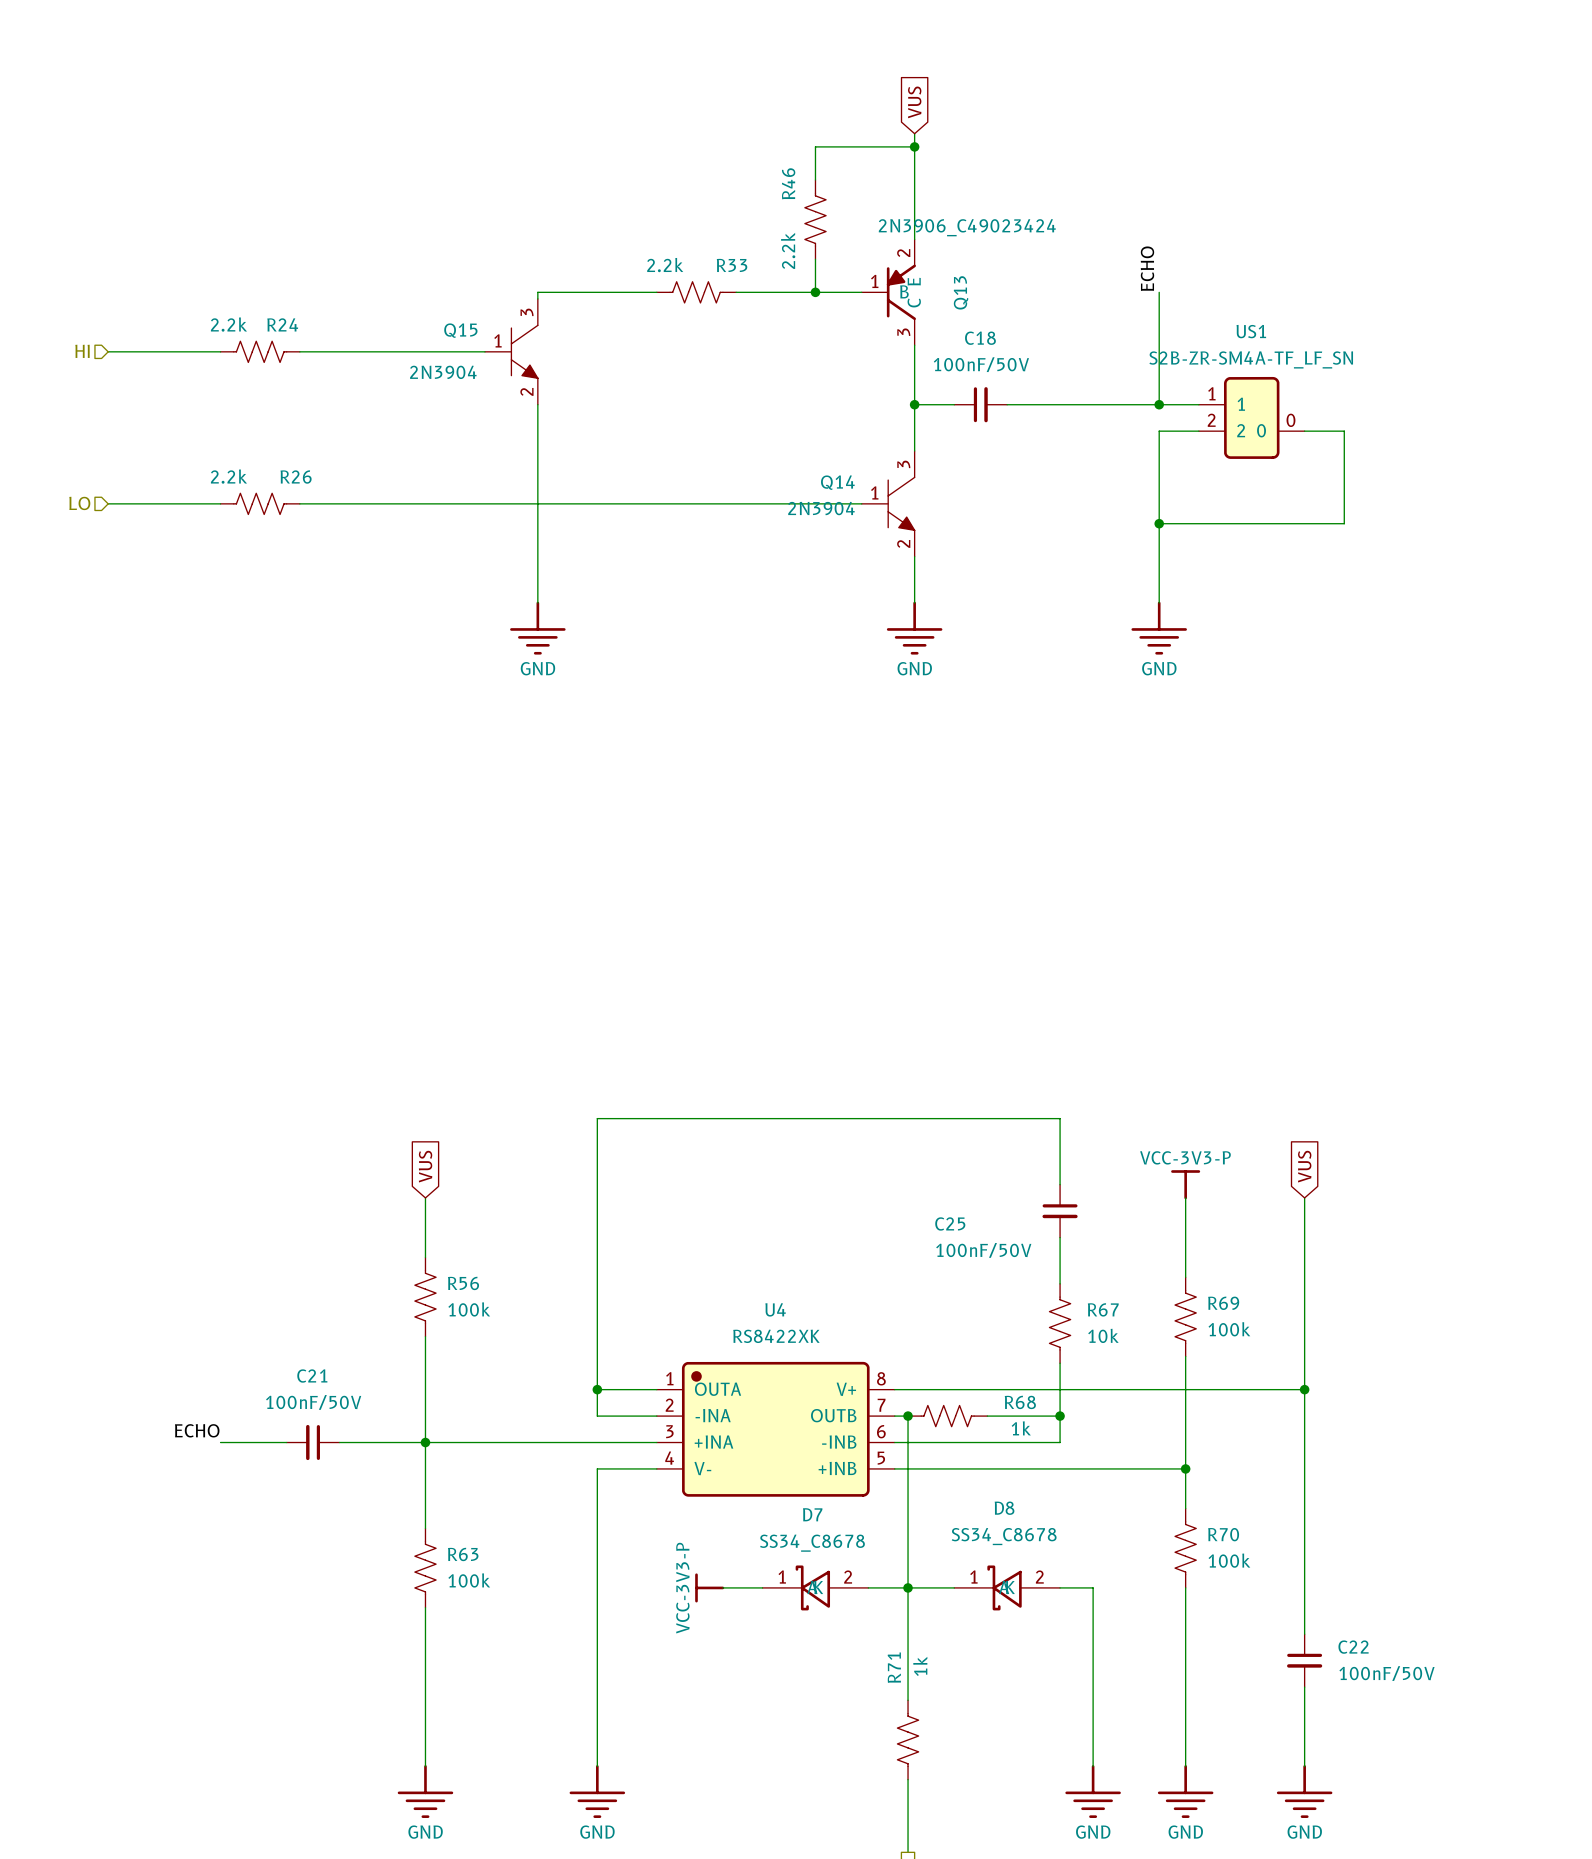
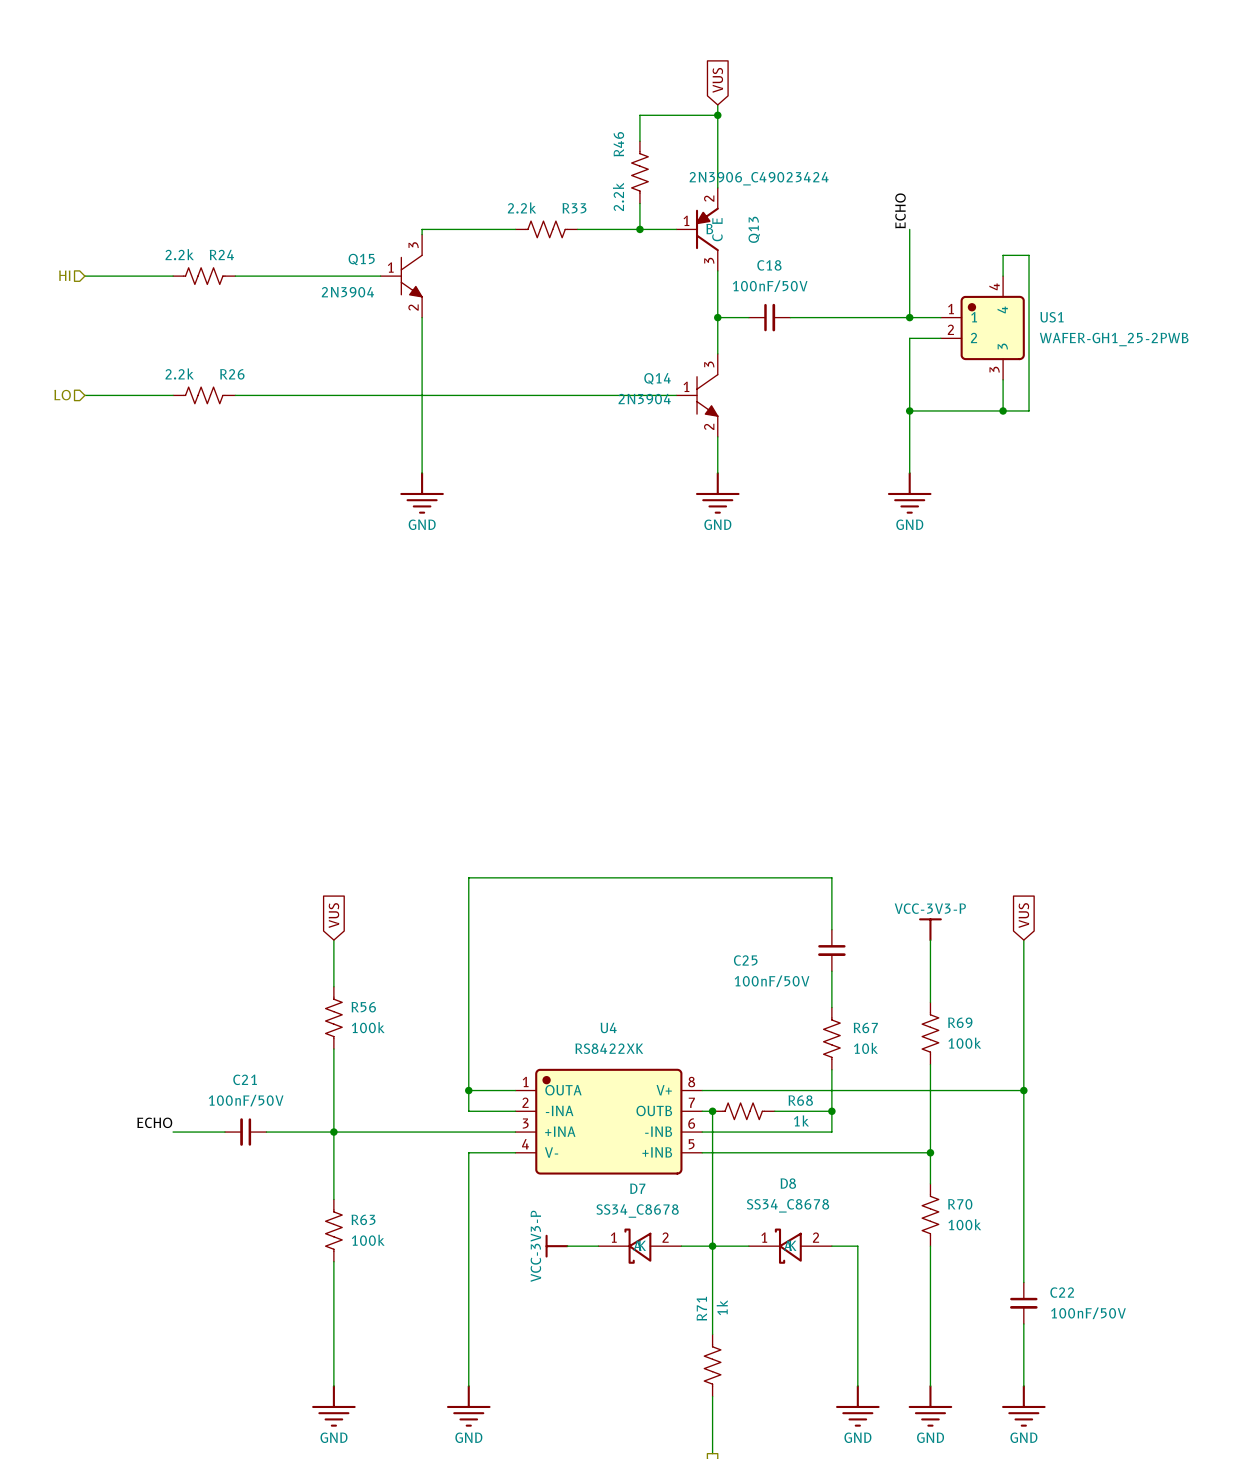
US1 name position: US1 (1251, 331) -> US1 (1052, 317)
US1 value: S2B-ZR-SM4A-TF_LF_SN (1251, 359) -> WAFER-GH1_25-2PWB (1114, 339)
US1 symbol: [1198, 376, 1305, 459] -> [940, 276, 1025, 380]
wire: (1304, 431) (1344, 431) (1344, 523) (1311, 523) -> (1003, 276) (1003, 255) (1029, 255) (1029, 410)
wire: none -> (1003, 379) (1003, 410)
junction: none -> (1003, 410)

